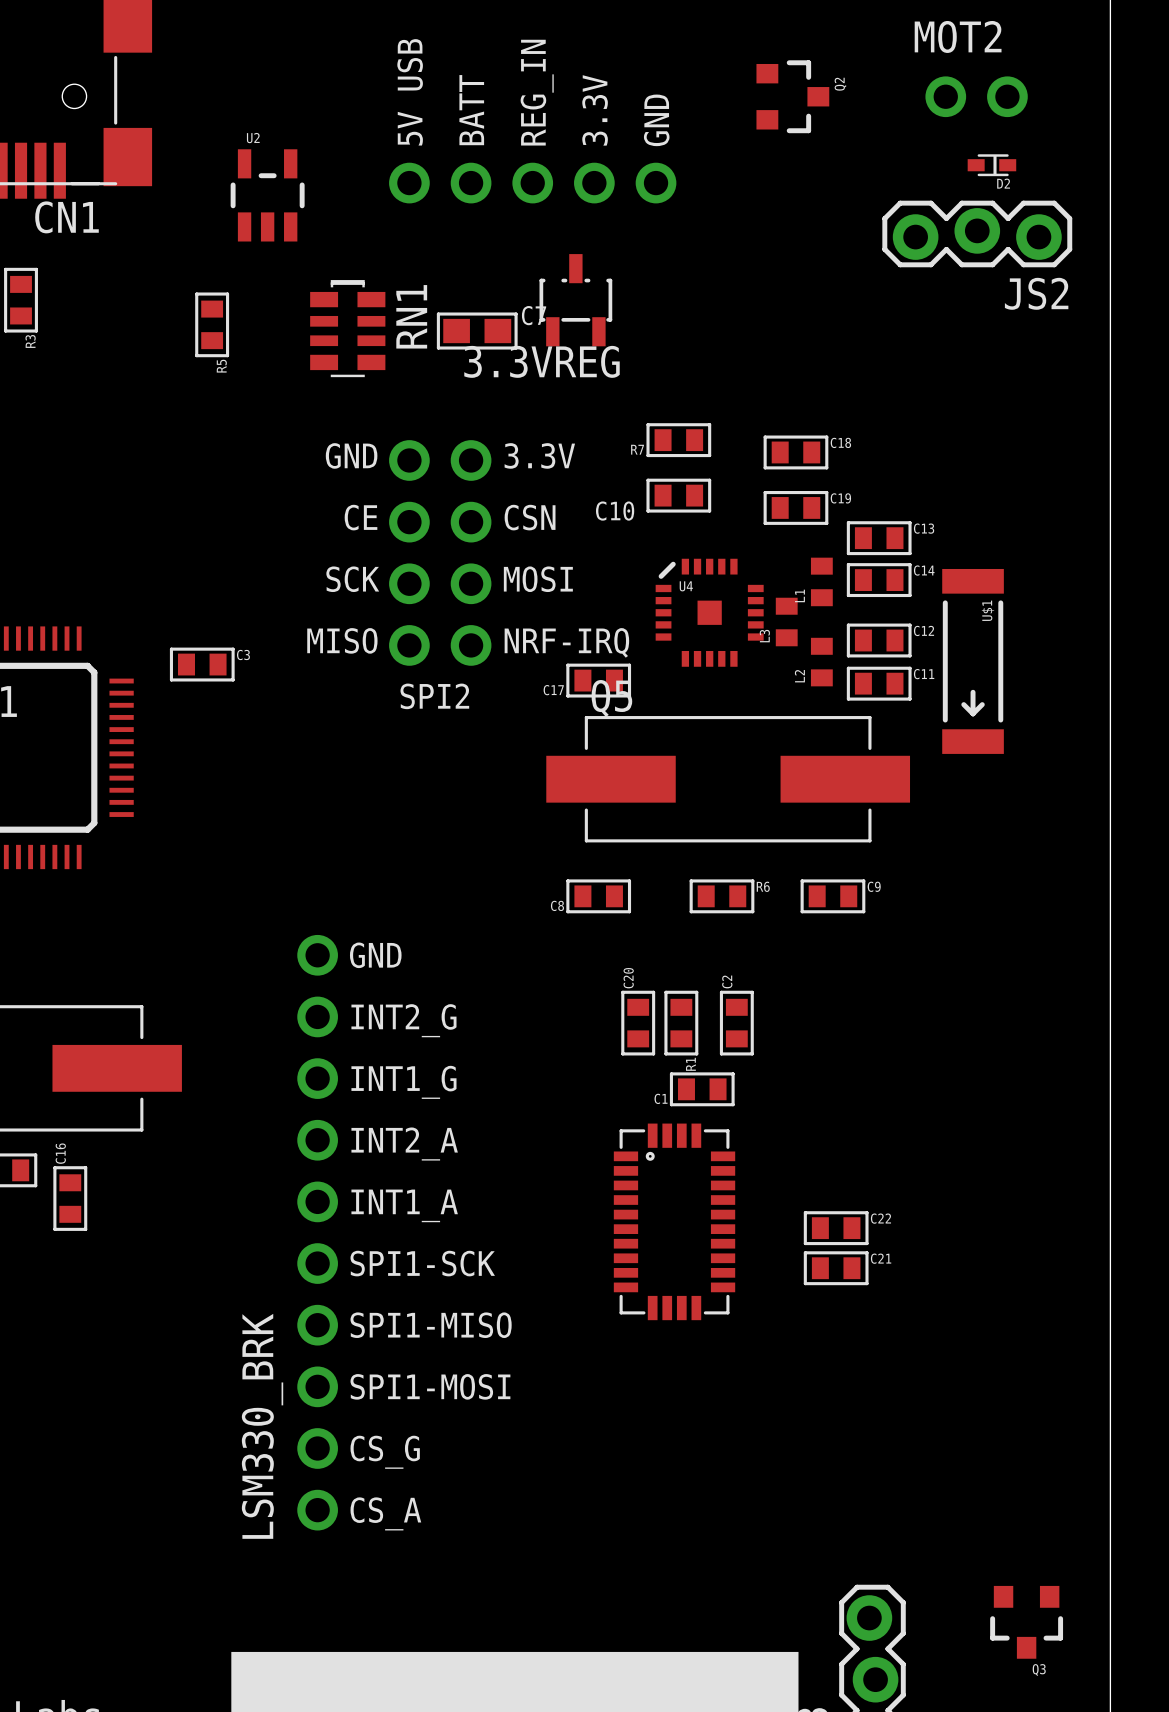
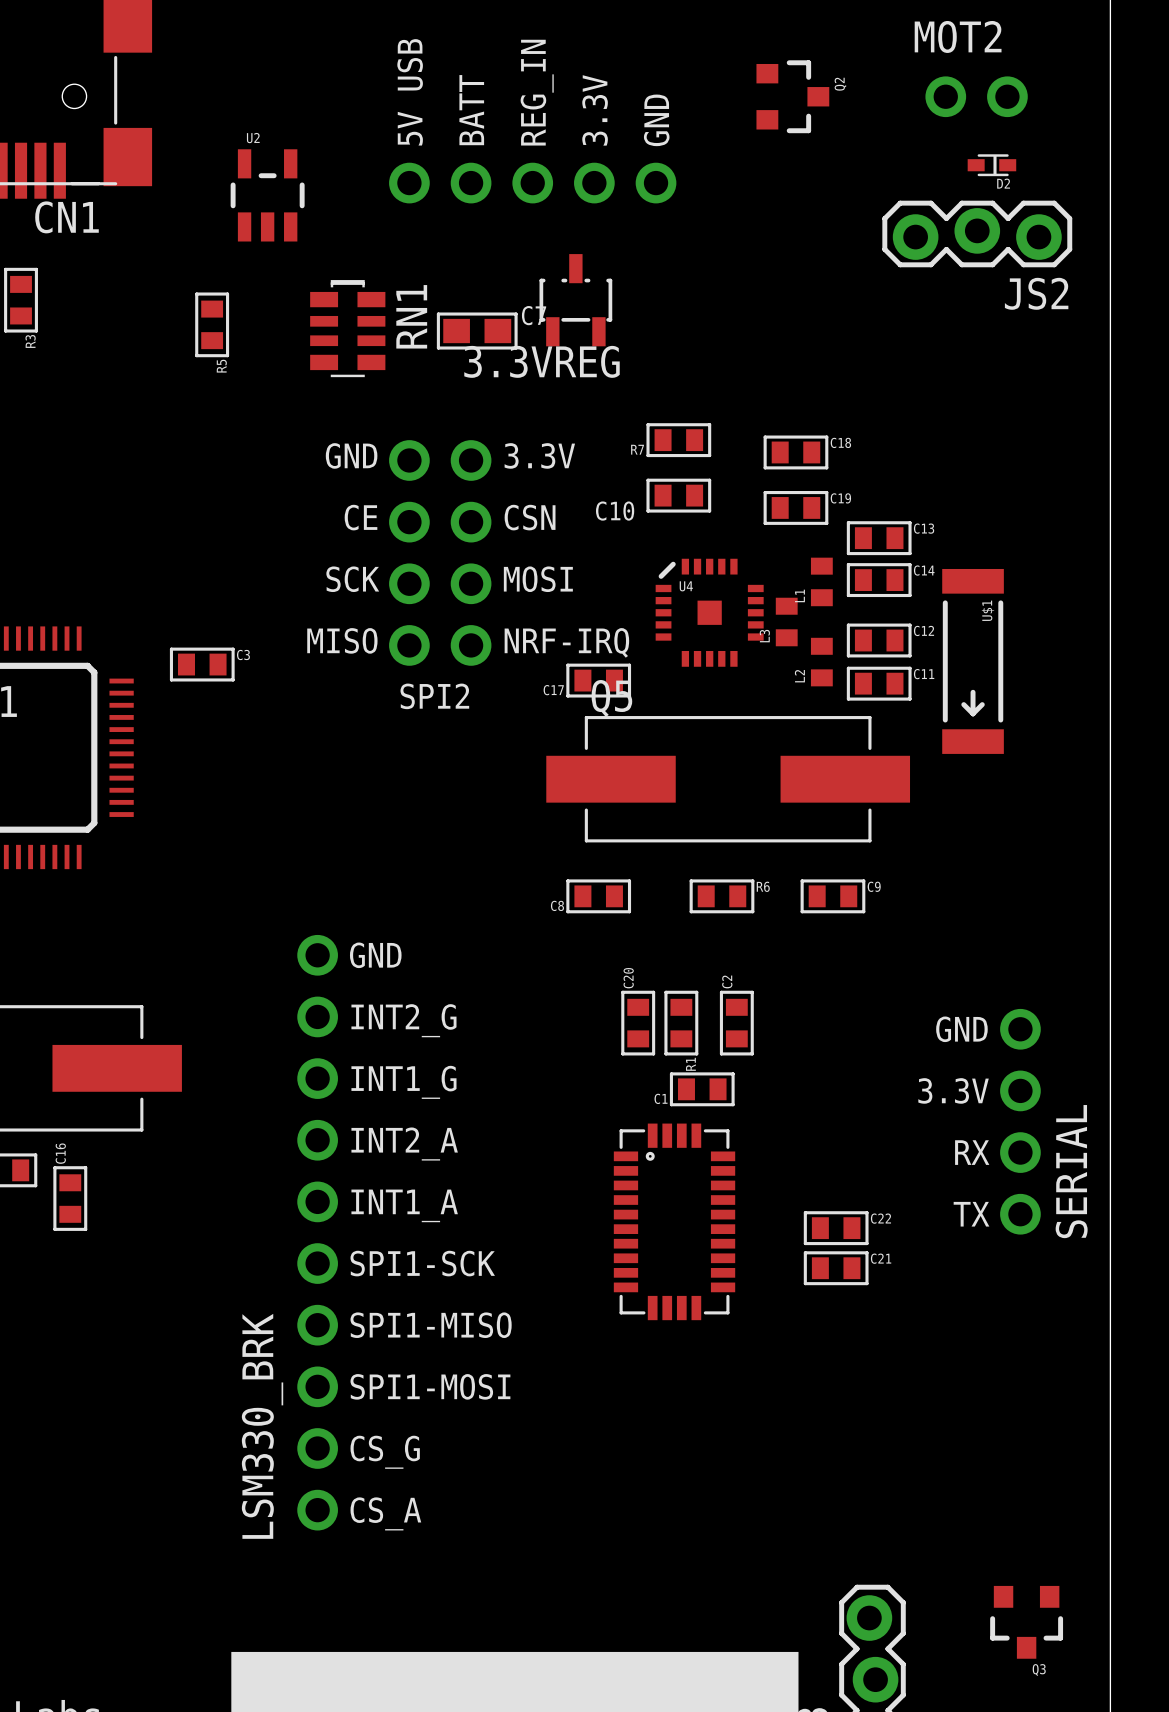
text: none -> GND (961, 1029)
text: none -> 3.3V (953, 1090)
SERIAL: none -> (1020, 1121)
text: none -> RX (972, 1152)
text: none -> TX (971, 1214)

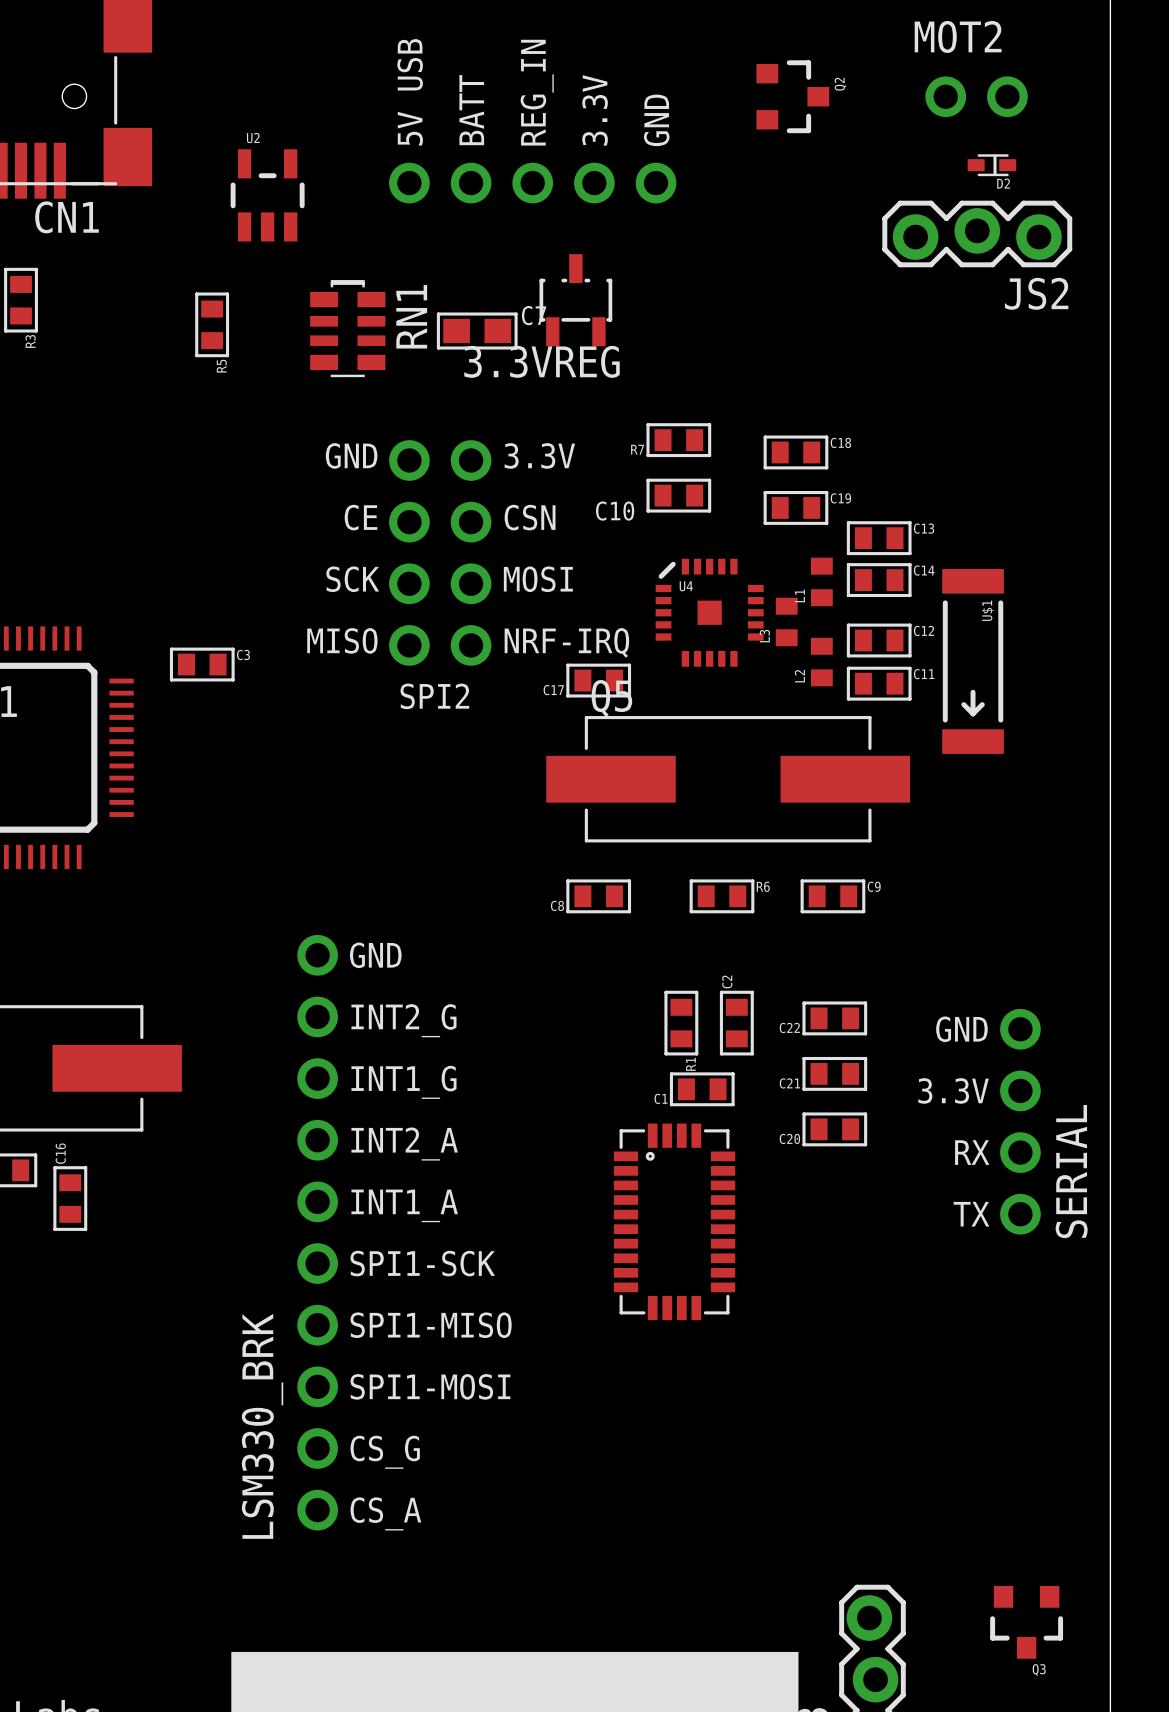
C20 name position: C20 (628, 978) -> C20 (789, 1138)
C20 rotation: 0° (638, 1023) -> 90° clockwise (834, 1129)
C20 position: (638, 1023) -> (834, 1129)
C22 name position: C22 (880, 1218) -> C22 (789, 1027)
C22 position: (836, 1228) -> (834, 1018)
C21 name position: C21 (881, 1258) -> C21 (789, 1083)
C21 position: (836, 1268) -> (834, 1073)

